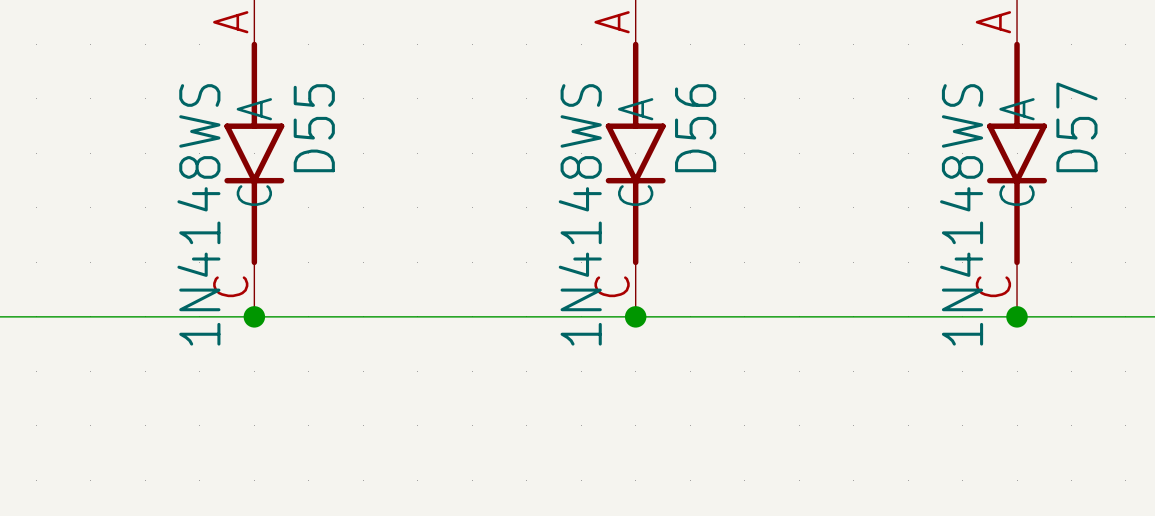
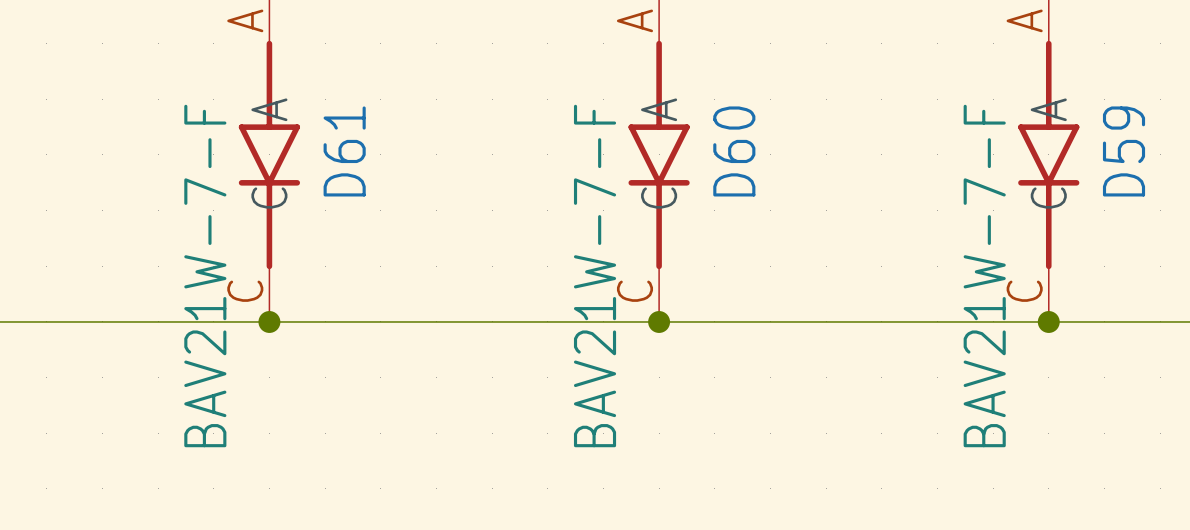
D57 name: D57 (1076, 127) -> D59 (1124, 151)
D55 name: D55 (314, 128) -> D61 (344, 151)
D56 name: D56 (695, 128) -> D60 (734, 151)
D55 value: 1N4148WS (198, 214) -> BAV21W-7-F (205, 276)
D56 value: 1N4148WS (580, 214) -> BAV21W-7-F (595, 276)
D57 value: 1N4148WS (961, 214) -> BAV21W-7-F (984, 276)

